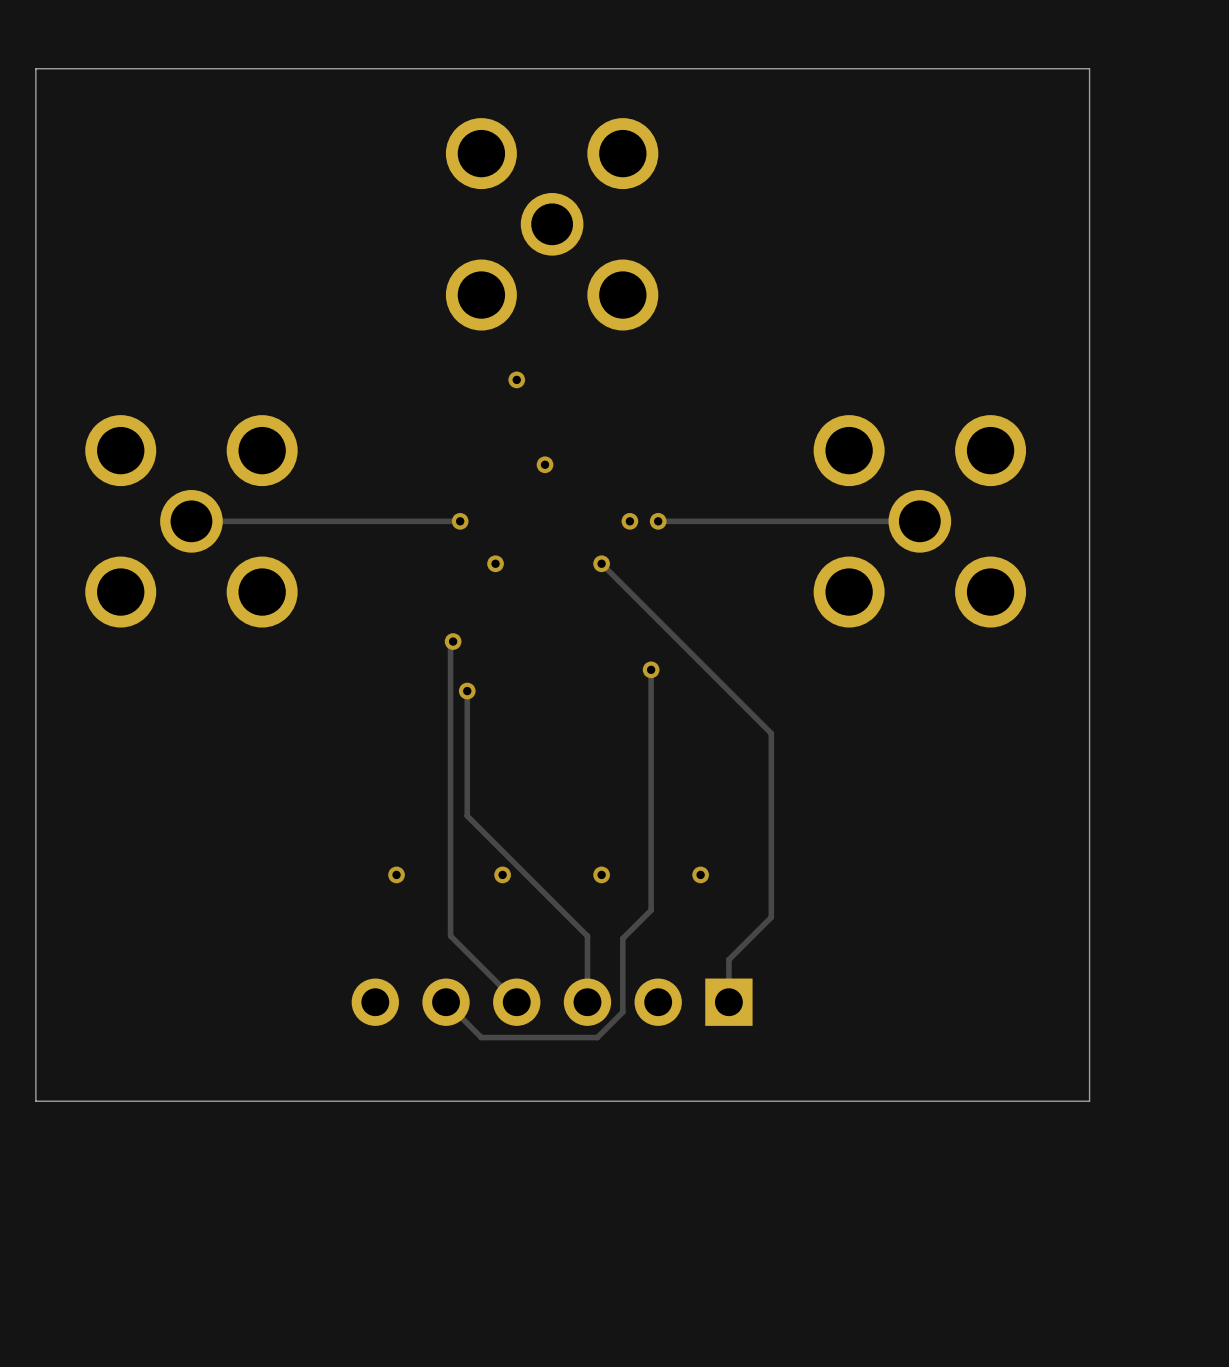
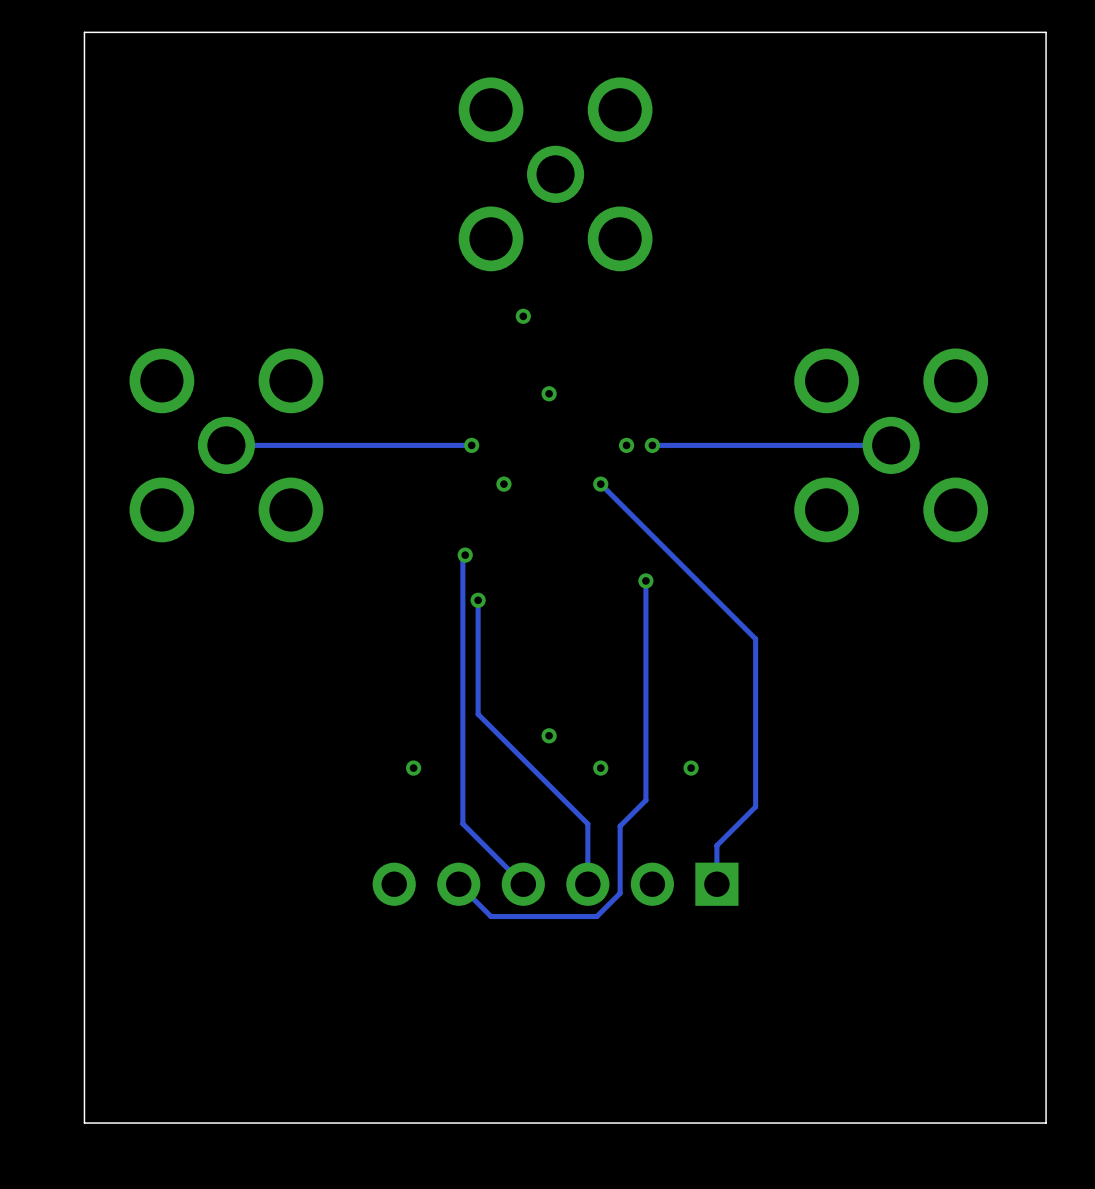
via position: (502, 874) -> (549, 735)
board edge: (1089, 1101) (35, 1101) -> (1046, 974) (1046, 1123) (84, 1123) (84, 974)

